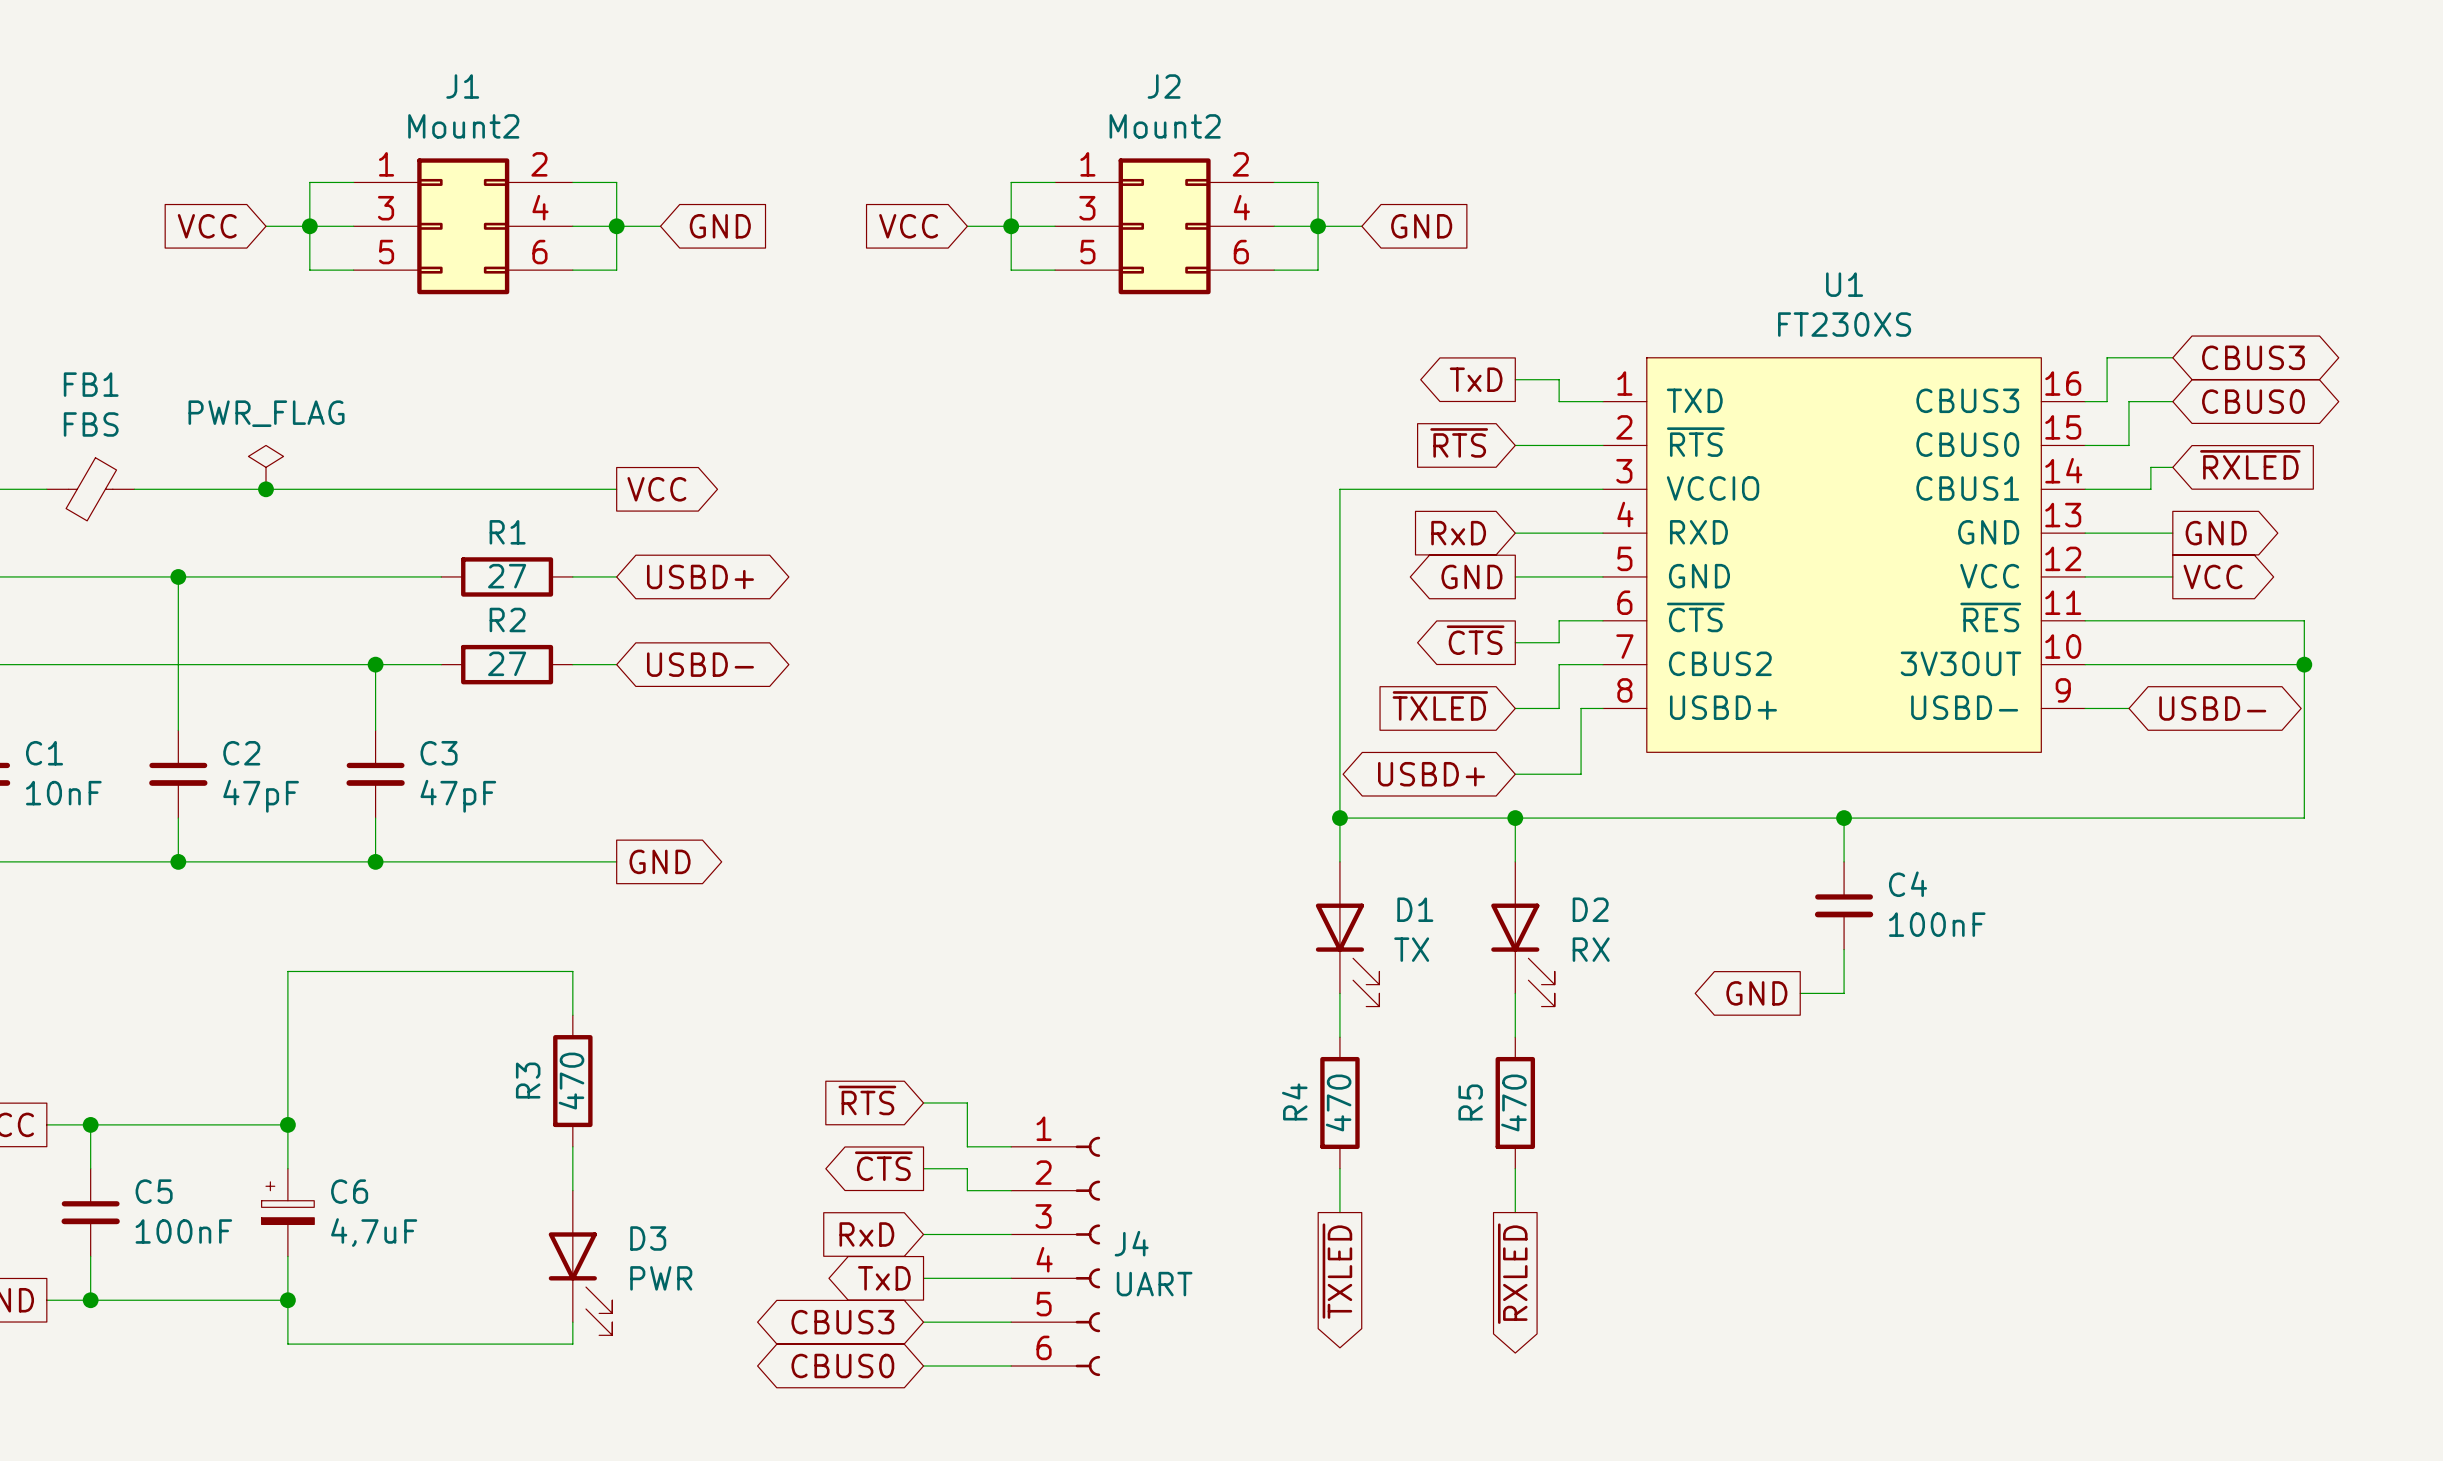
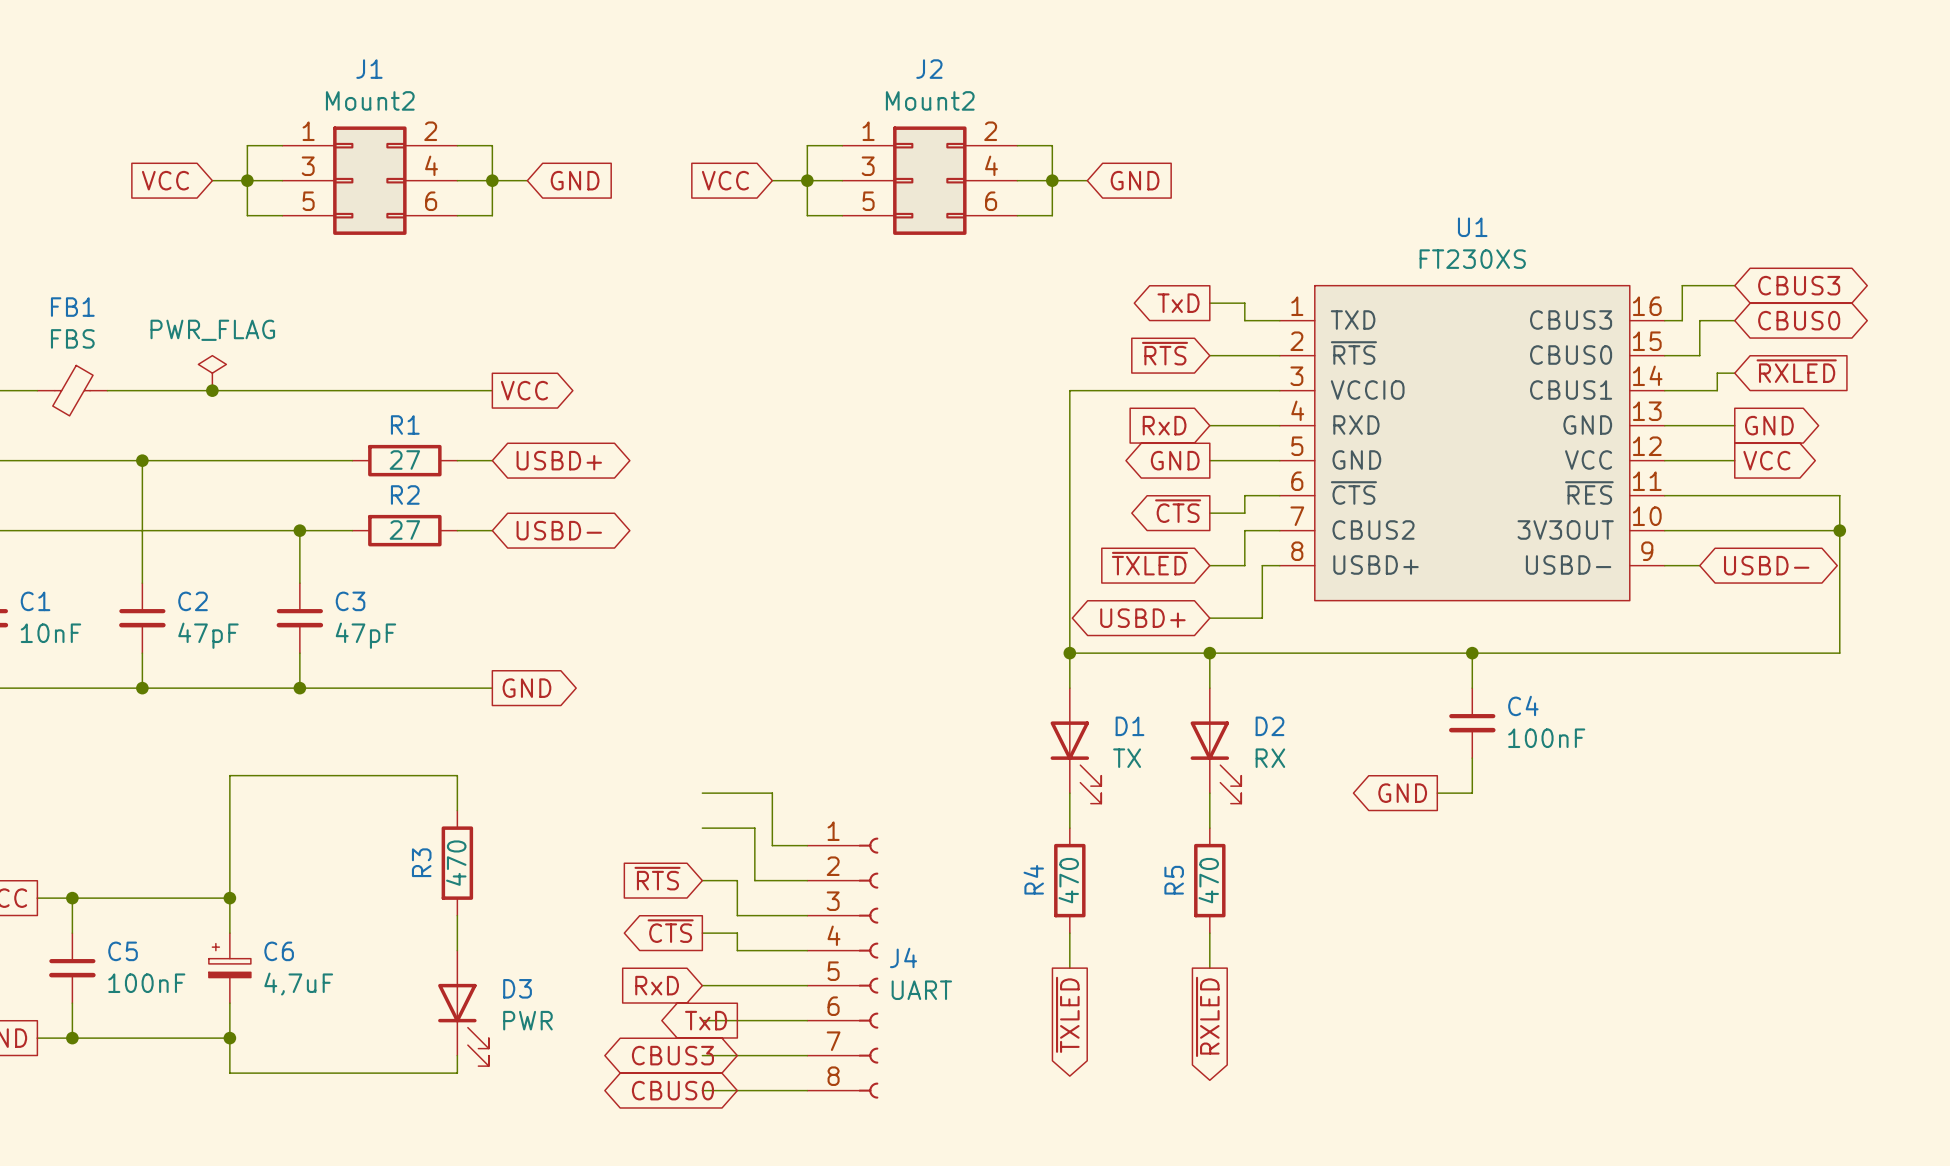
wire: none -> (702, 793) (772, 793) (772, 845) (807, 845)
global label position: ~{RTS} (867, 1100) -> ~{RTS} (657, 878)
wire: none -> (702, 880) (737, 880) (737, 915) (772, 915)
wire: (923, 1102) (945, 1102) -> (702, 828) (754, 828) (754, 880)
wire: (967, 1102) (967, 1146) -> (772, 880) (807, 880)
J4 symbol: [1011, 1136, 1101, 1377] -> [807, 837, 879, 1099]
global label position: ~{CTS} (883, 1166) -> ~{CTS} (670, 931)
wire: (923, 1168) (967, 1168) (967, 1190) -> (702, 933) (737, 933) (737, 950) (772, 950)
global label position: RxD (866, 1234) -> RxD (657, 985)
wire: none -> (702, 985) (737, 985)
wire: none -> (702, 1020) (737, 1020)
wire: none -> (702, 1055) (737, 1055)
wire: none -> (702, 1090) (737, 1090)

